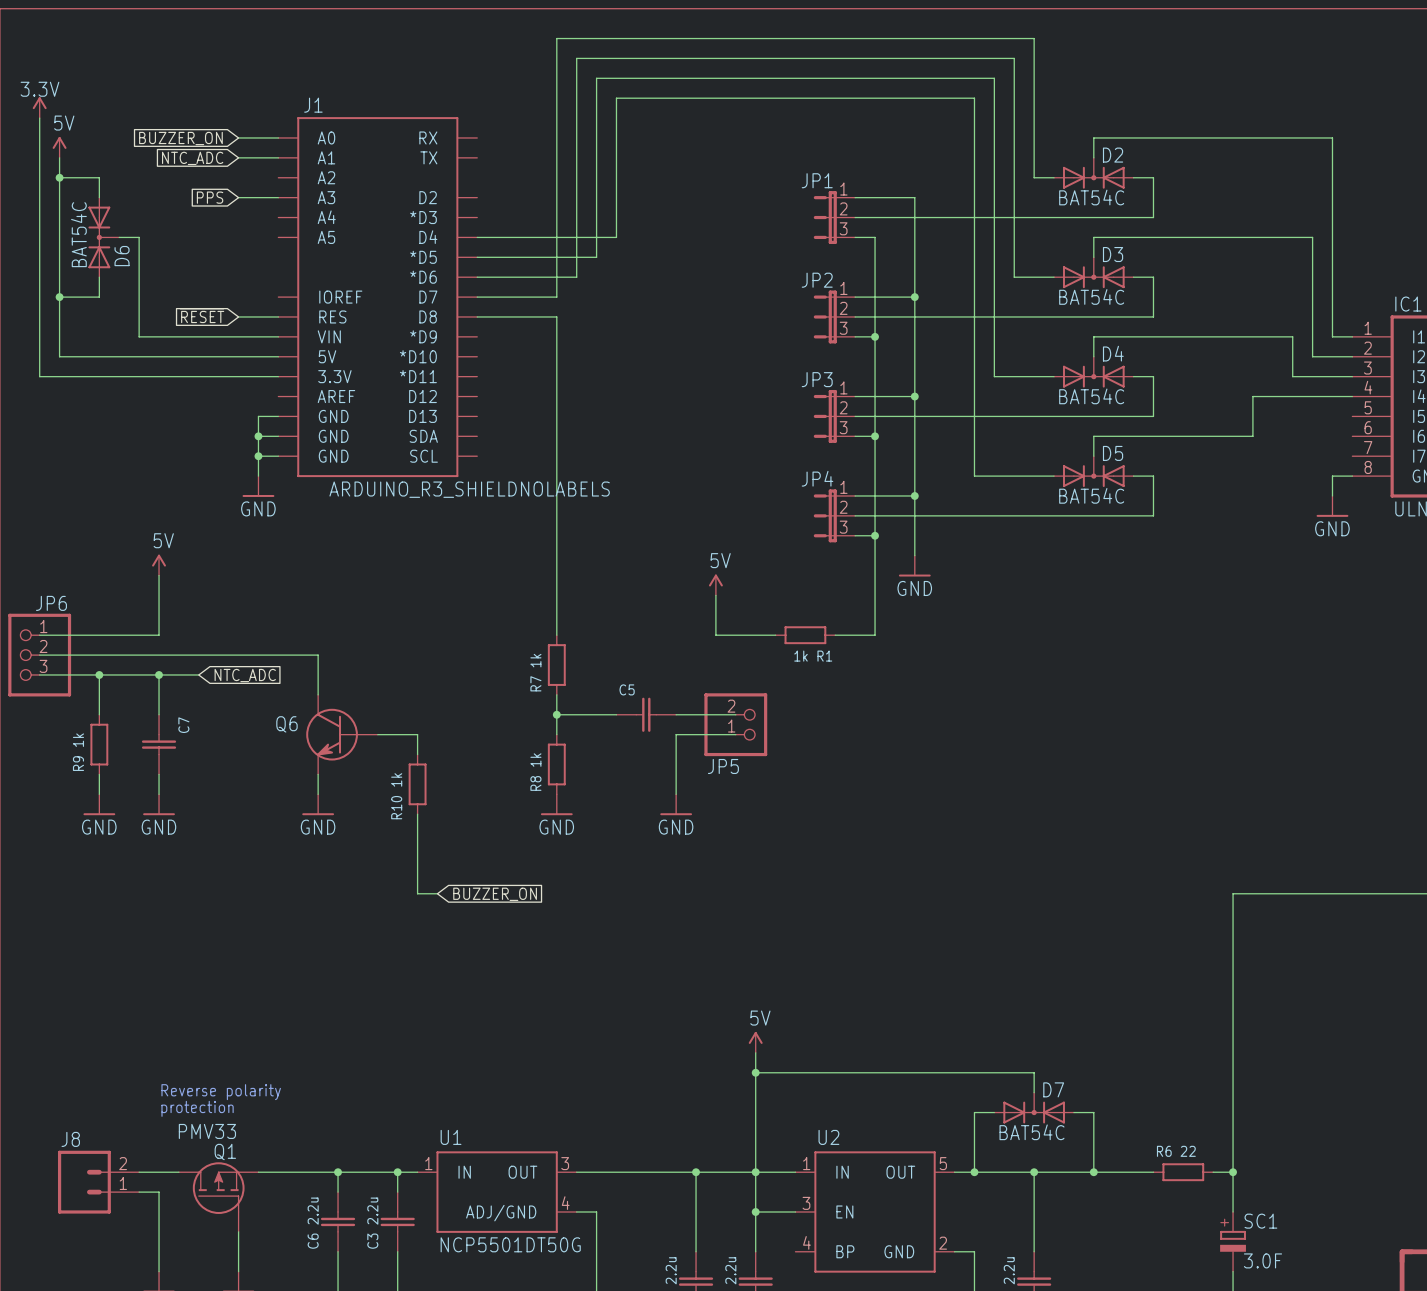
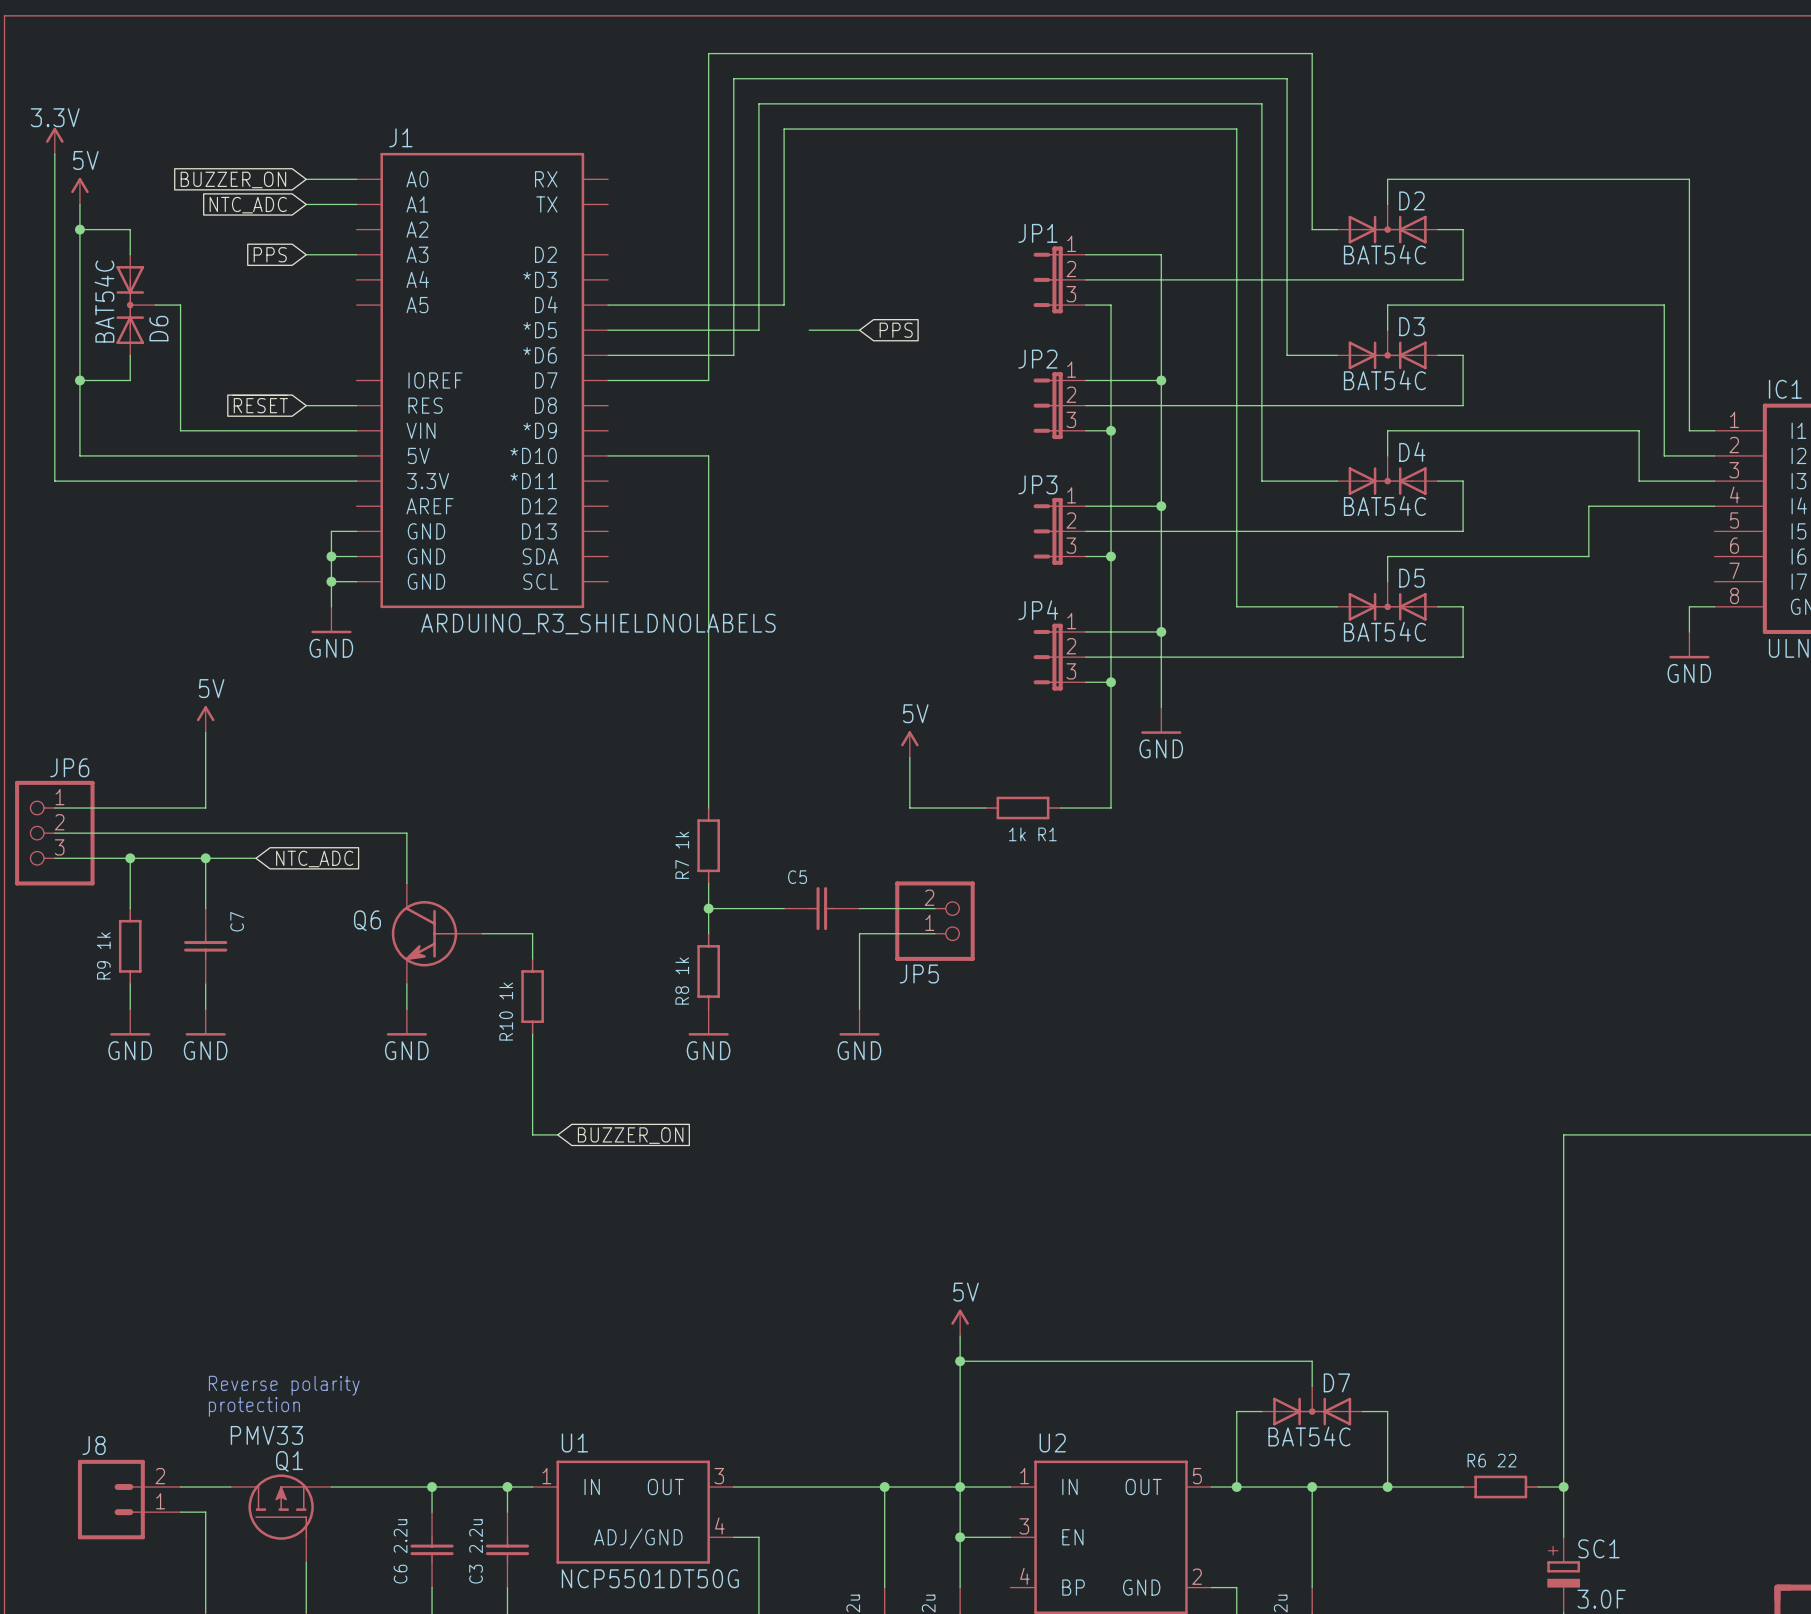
wire: none -> (809, 330) (859, 330)
global label: none -> PPS (896, 330)
wire: (477, 316) (556, 316) (556, 356) -> (608, 455) (708, 455)

